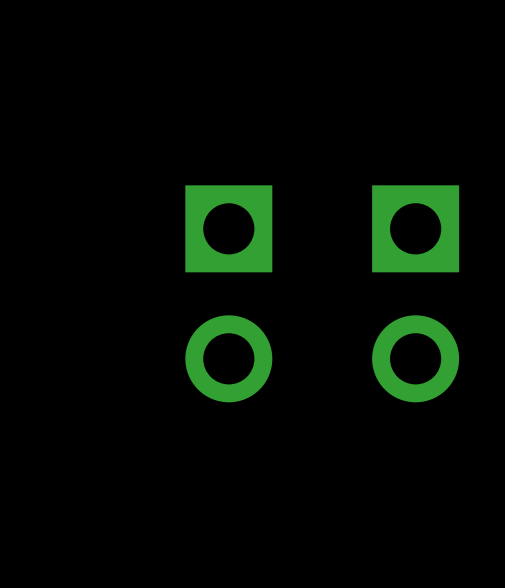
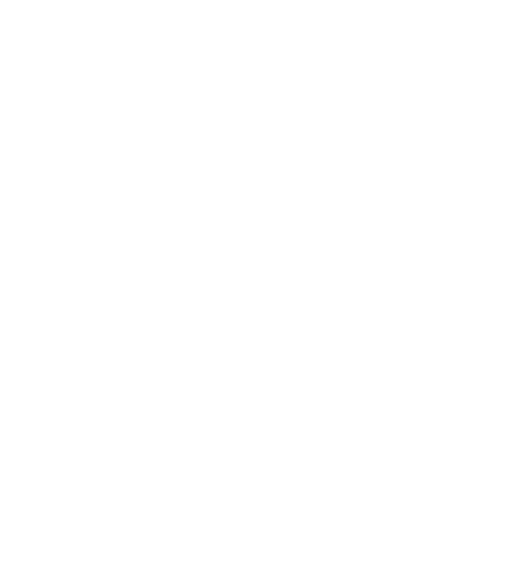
part: (228, 293) -> none
part: (415, 293) -> none

